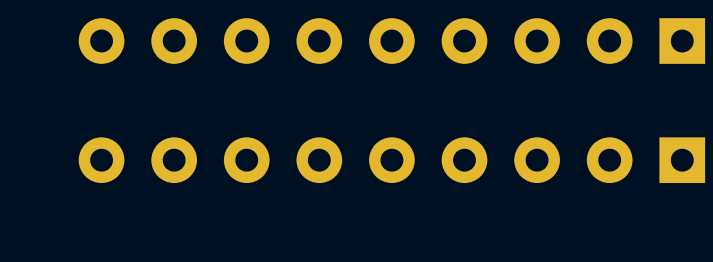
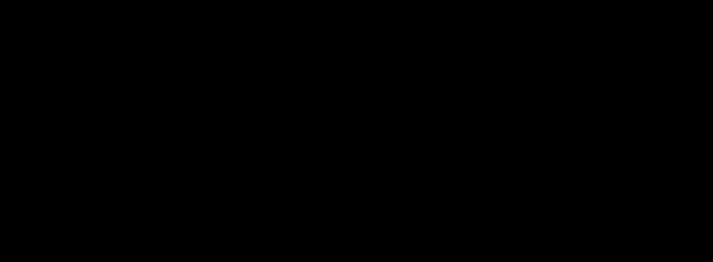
part: (391, 41) -> none
part: (391, 160) -> none

